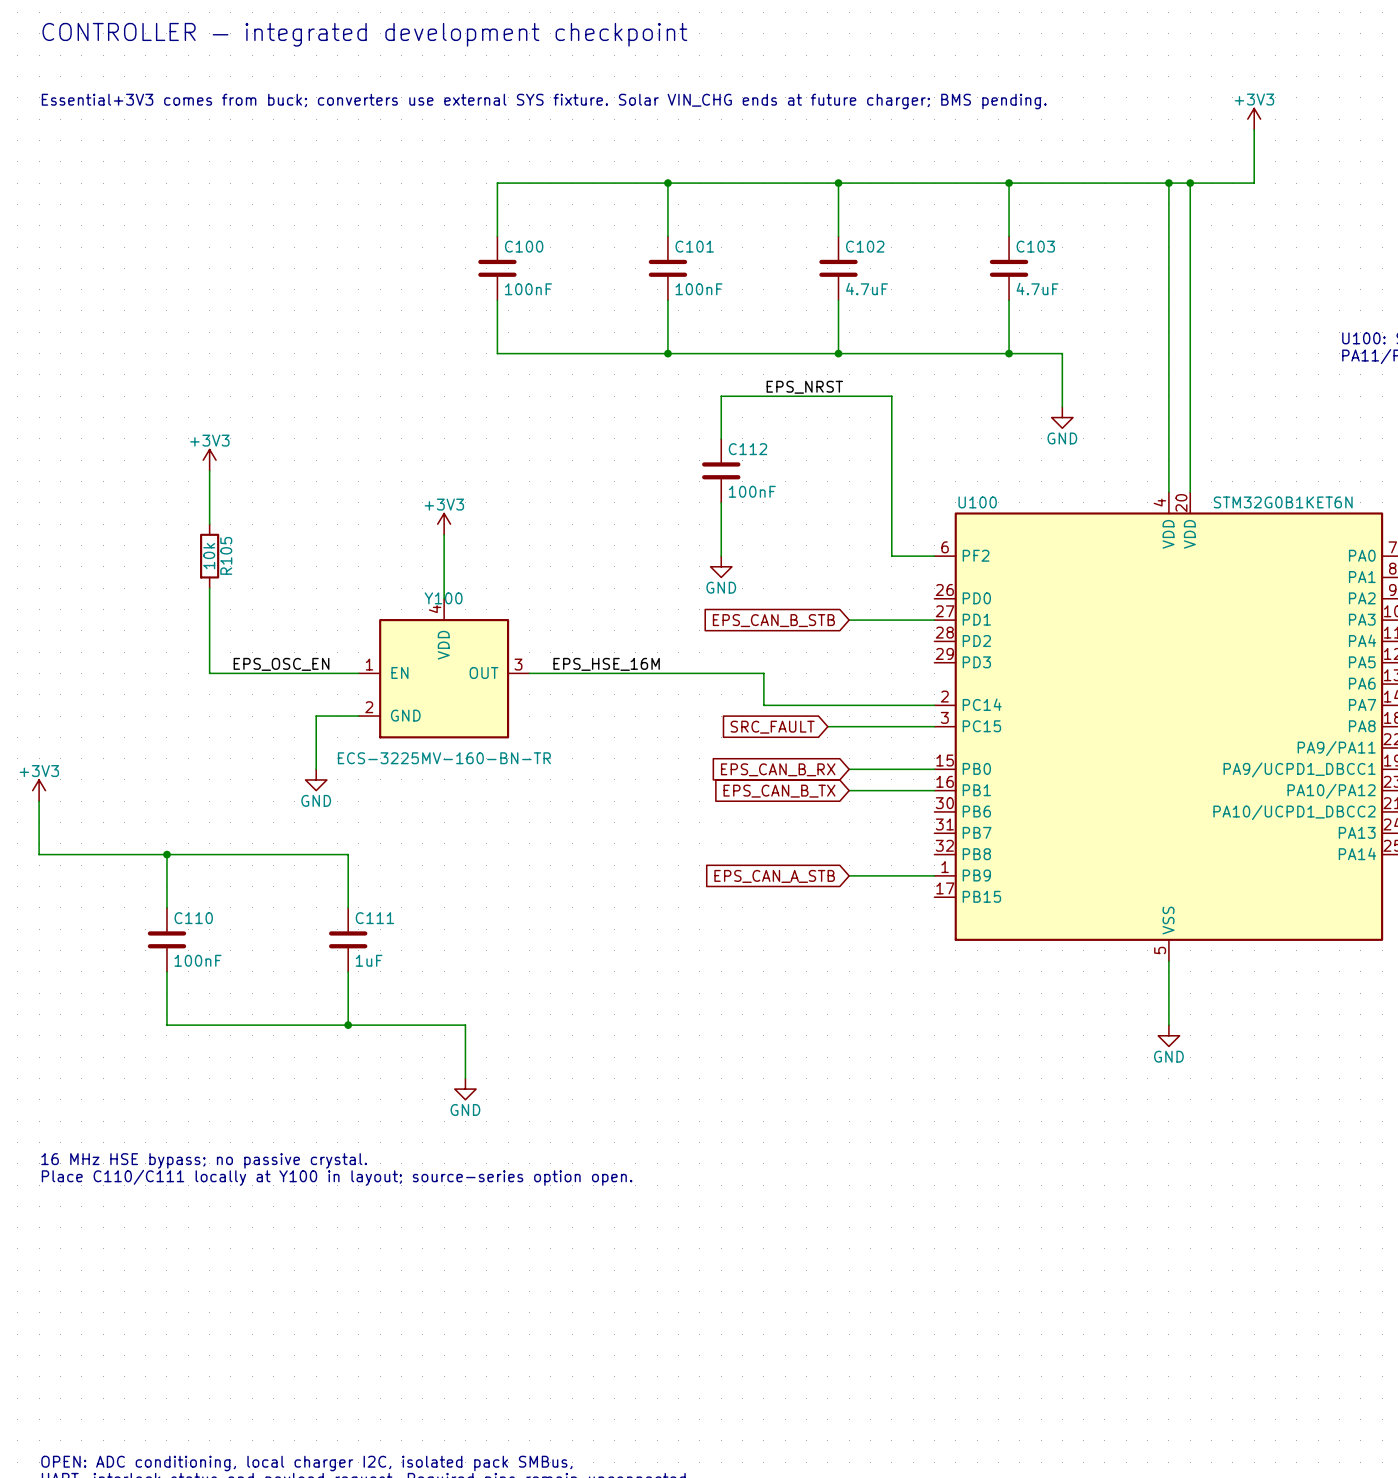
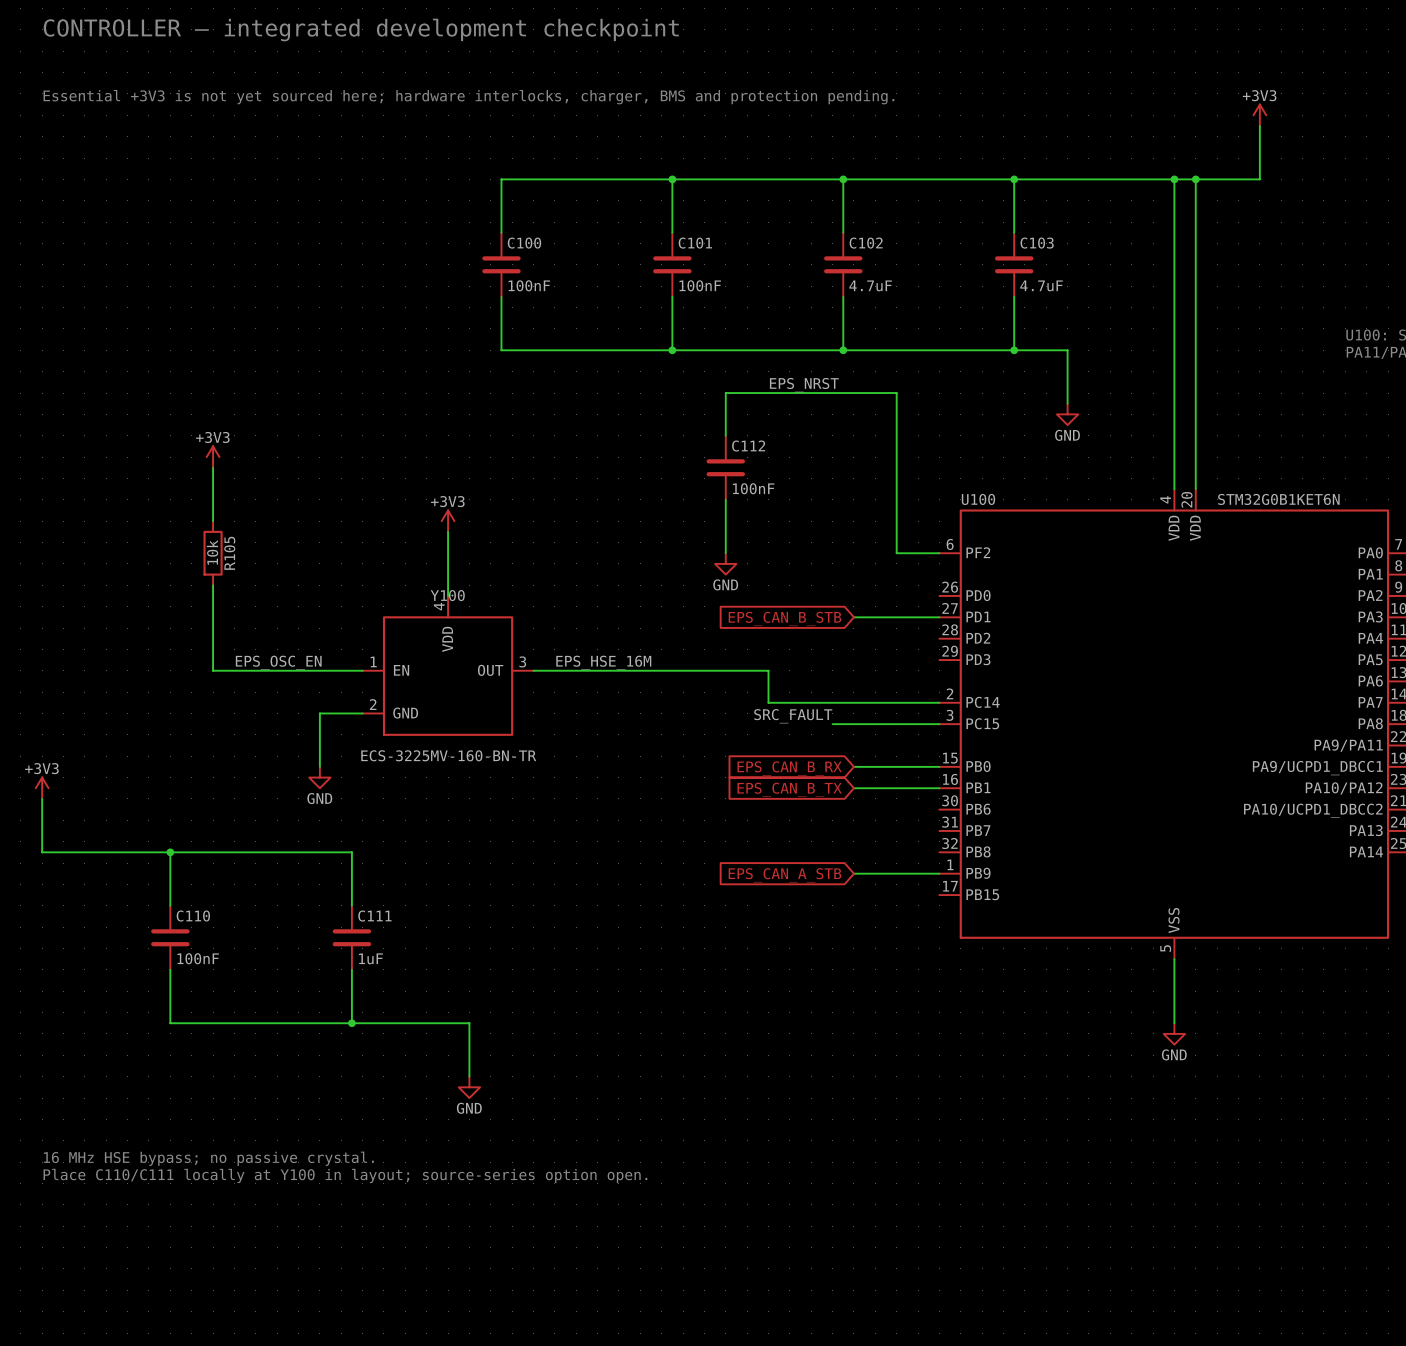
text: Essential+3V3 comes from buck; converters use external SYS fixture. Solar VIN_CHG ends at future charger; BMS pending. (544, 101) -> Essential +3V3 is not yet sourced here; hardware interlocks, charger, BMS and protection pending. (468, 97)
label: none -> SRC_FAULT (793, 716)
global label: SRC_FAULT (772, 727) -> none

